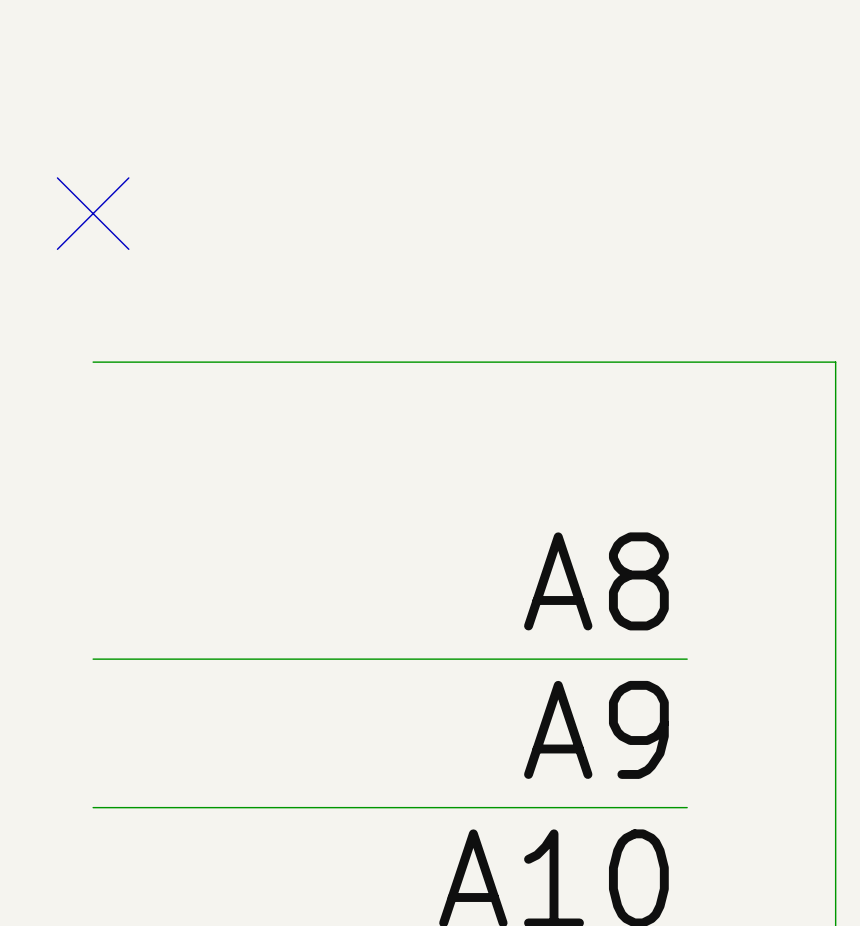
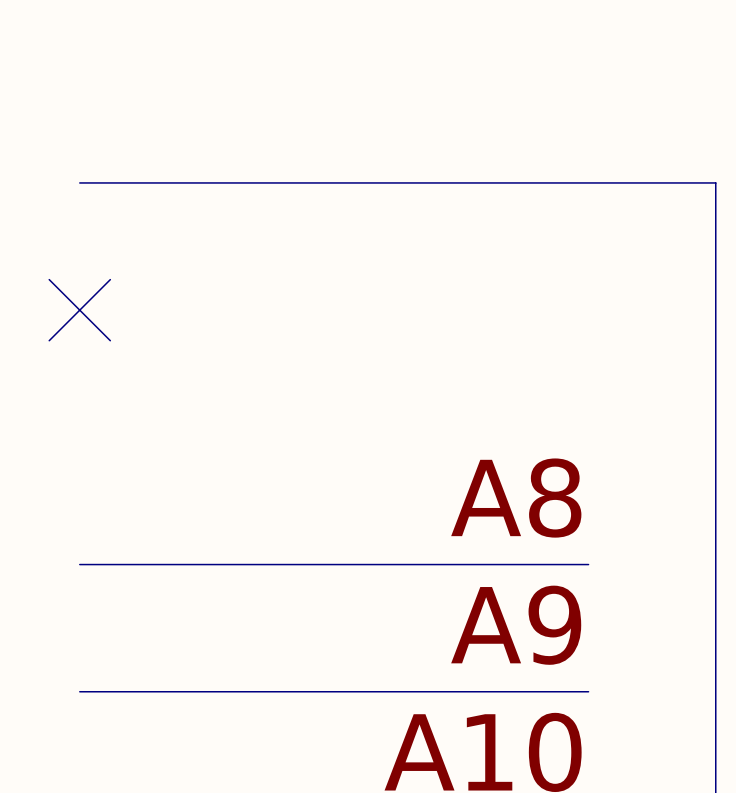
no-connect mark position: (93, 213) -> (79, 310)
wire: (93, 362) (835, 362) -> (79, 182) (715, 182) (715, 310)

